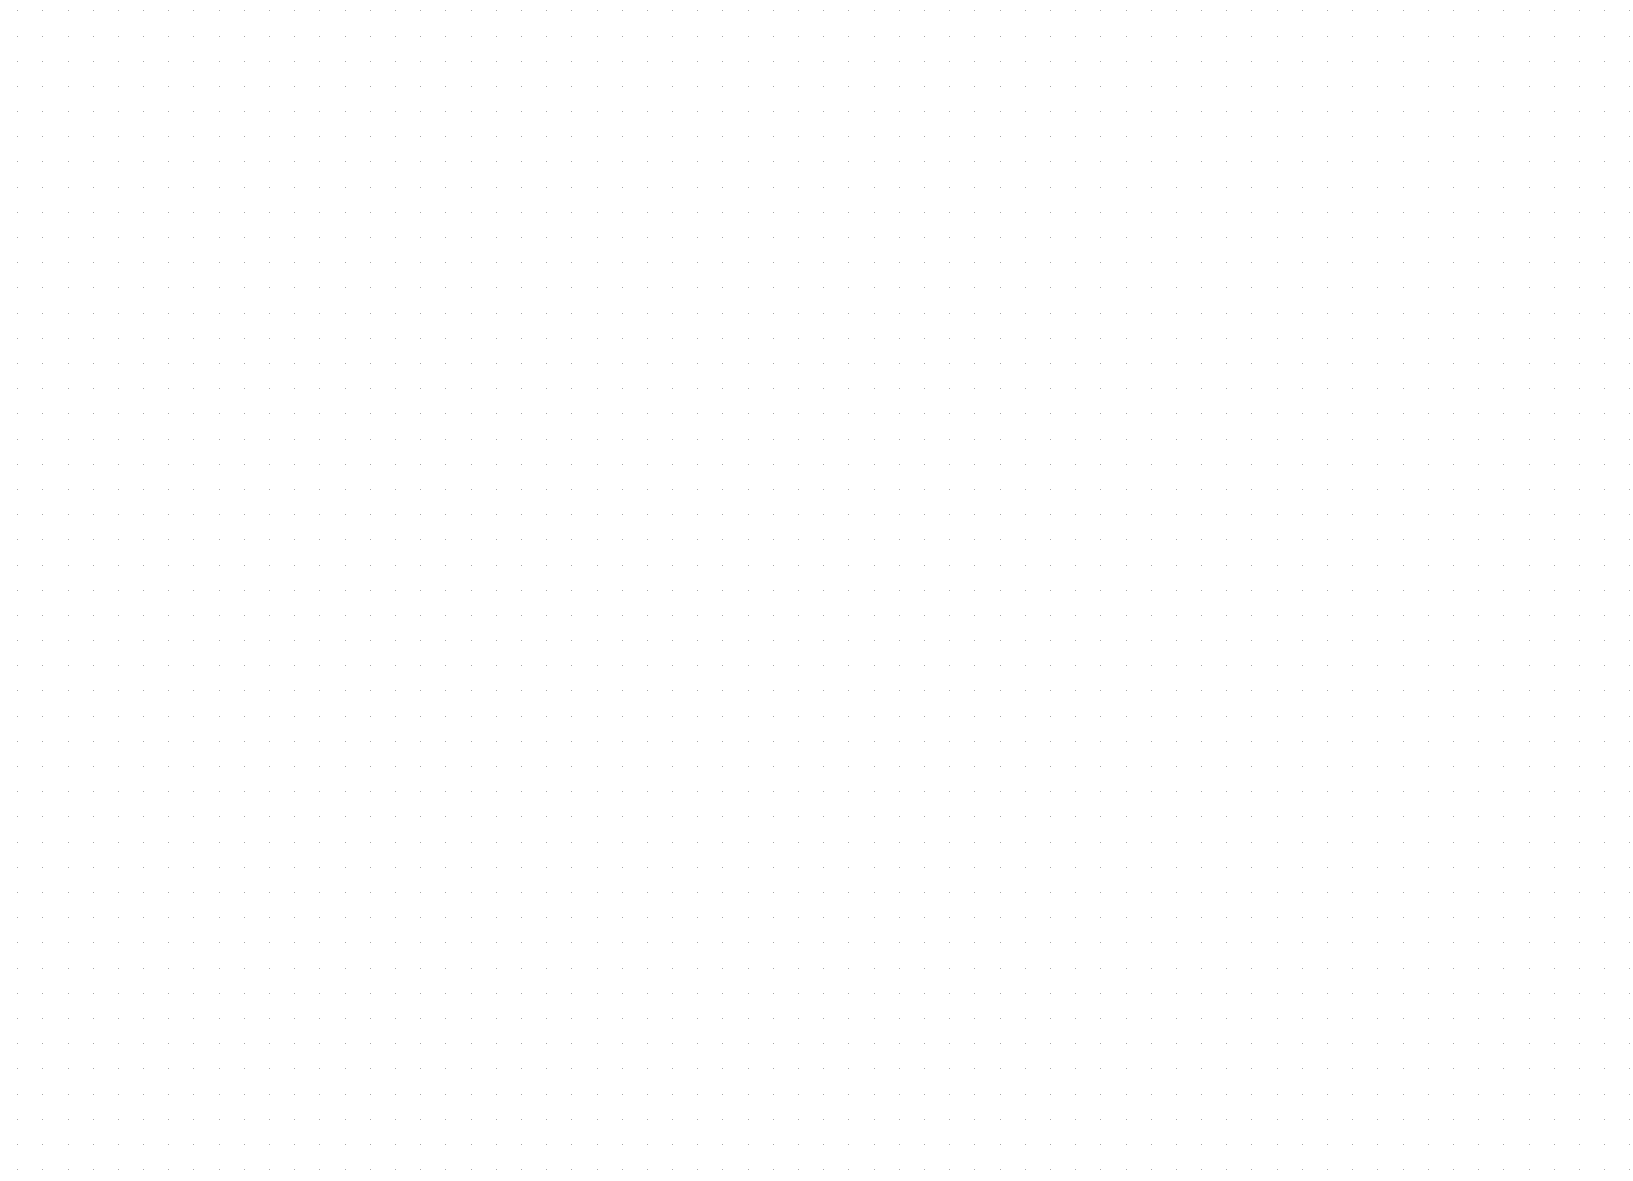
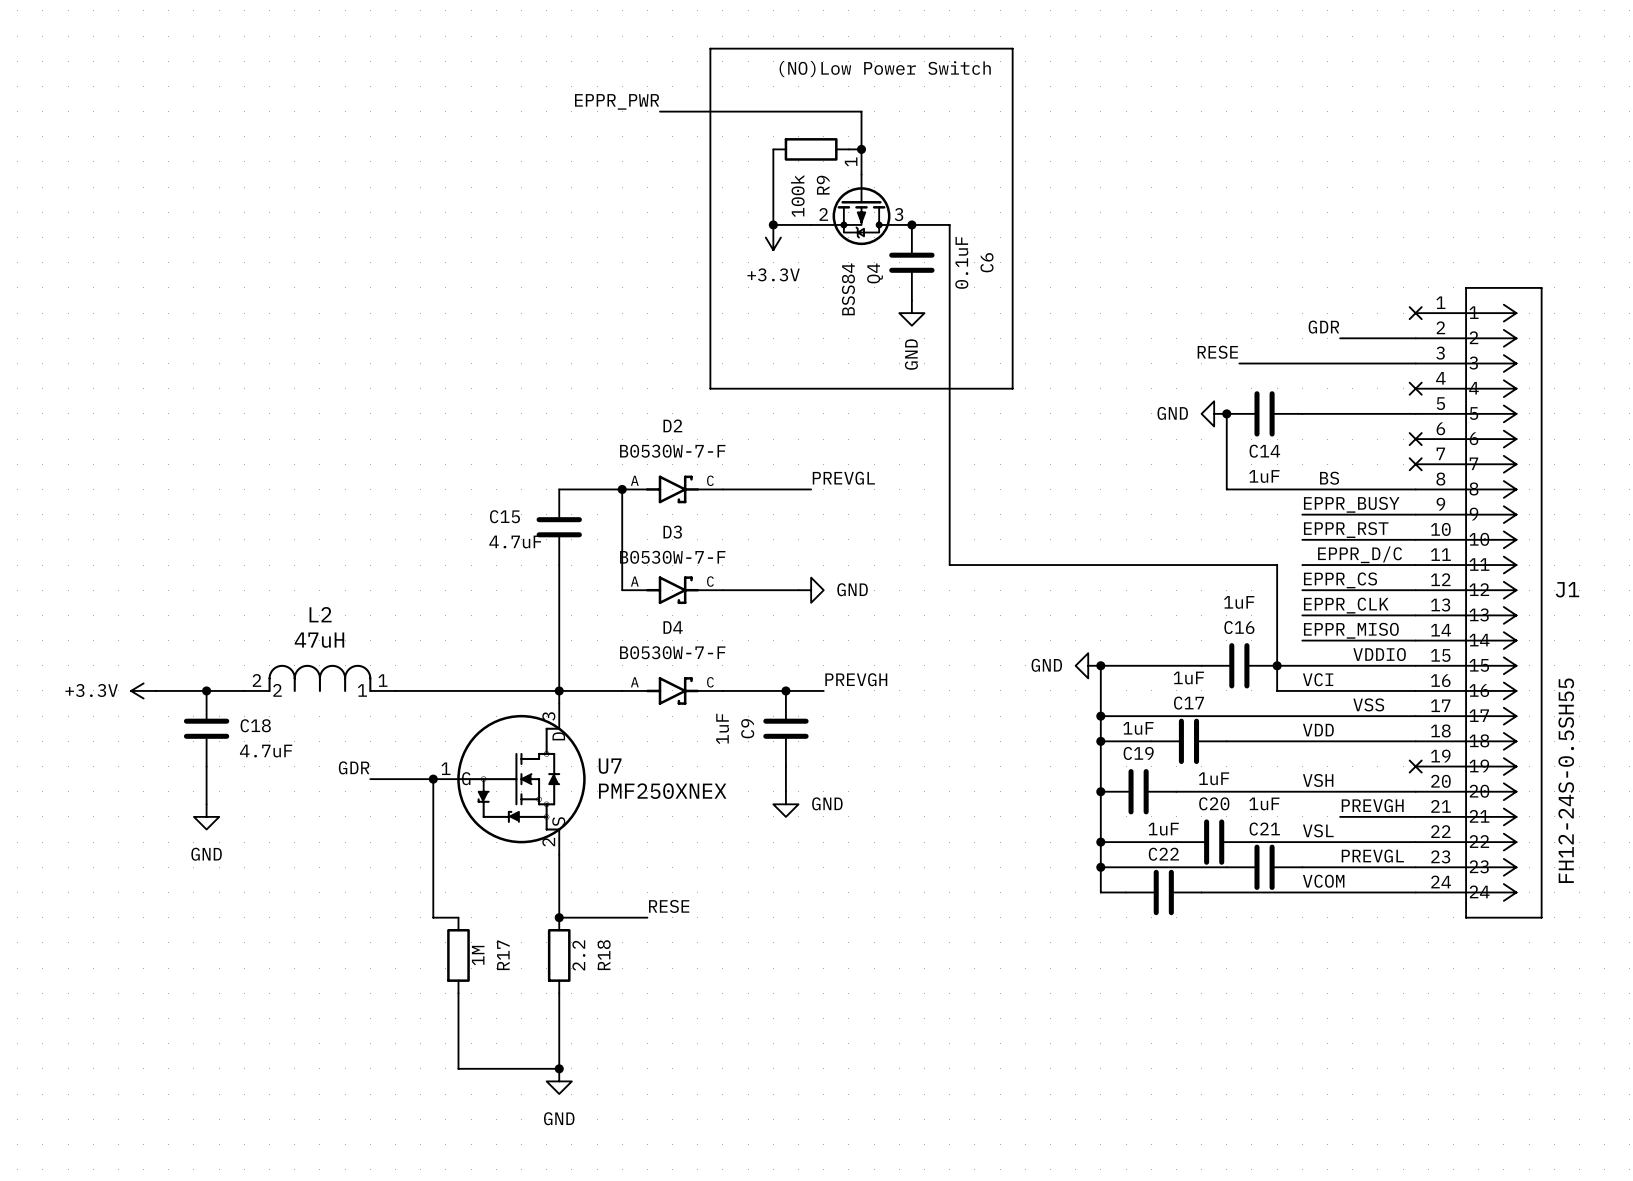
line: none -> (710, 48) (1012, 48) (1012, 388) (710, 388) (710, 48)
text: none -> (NO)Low Power Switch (885, 69)
label: none -> EPPR_PWR (617, 101)
wire: none -> (660, 111) (861, 111) (861, 149) (848, 149)
wire: none -> (773, 149) (773, 224) (811, 224)
R9: none -> 100k (811, 149)
junction: none -> (861, 149)
Q4: none -> BSS84 (861, 197)
junction: none -> (773, 224)
wire: none -> (911, 224) (949, 224) (949, 565) (1277, 565) (1277, 690) (1415, 690)
junction: none -> (911, 224)
power symbol: none -> +3.3V (773, 237)
C6: none -> 0.1uF (911, 262)
power symbol: none -> GND (911, 313)
no-connect mark: none -> (1415, 313)
label: none -> GDR (1323, 327)
wire: none -> (1340, 338) (1415, 338)
label: none -> RESE (1217, 352)
wire: none -> (1239, 363) (1415, 363)
no-connect mark: none -> (1415, 388)
power symbol: none -> GND (1214, 413)
wire: none -> (1226, 413) (1226, 489) (1415, 489)
junction: none -> (1226, 413)
C14: none -> 1uF (1264, 413)
wire: none -> (1302, 413) (1415, 413)
no-connect mark: none -> (1415, 439)
no-connect mark: none -> (1415, 464)
label: none -> PREVGL (843, 478)
label: none -> BS (1329, 478)
wire: none -> (559, 489) (622, 489) (622, 590)
junction: none -> (622, 489)
D2: none -> B0530W-7-F (672, 489)
wire: none -> (722, 489) (811, 489)
label: none -> EPPR_BUSY (1351, 504)
wire: none -> (1302, 514) (1415, 514)
C15: none -> 4.7uF (559, 527)
label: none -> EPPR_RST (1346, 530)
wire: none -> (1302, 539) (1415, 539)
label: none -> EPPR_D/C (1360, 554)
wire: none -> (559, 565) (559, 703)
wire: none -> (1302, 565) (1415, 565)
label: none -> EPPR_CS (1340, 580)
D3: none -> B0530W-7-F (672, 590)
wire: none -> (722, 590) (798, 590)
power symbol: none -> GND (811, 590)
wire: none -> (1302, 590) (1415, 590)
J1: none -> FH12-24S-0.5SH55 (1478, 602)
label: none -> EPPR_CLK (1346, 605)
wire: none -> (1302, 615) (1415, 615)
label: none -> EPPR_MISO (1351, 630)
wire: none -> (1302, 640) (1415, 640)
label: none -> VDDIO (1379, 654)
power symbol: none -> GND (1088, 665)
junction: none -> (1100, 665)
wire: none -> (1201, 665) (1100, 665) (1100, 892) (1126, 892)
C16: none -> 1uF (1239, 665)
wire: none -> (1277, 665) (1415, 665)
junction: none -> (1277, 665)
L2: none -> 47uH (319, 678)
label: none -> PREVGH (856, 679)
label: none -> VCI (1318, 679)
power symbol: none -> +3.3V (143, 690)
wire: none -> (156, 690) (244, 690)
junction: none -> (206, 690)
wire: none -> (395, 690) (622, 690)
junction: none -> (559, 690)
D4: none -> B0530W-7-F (672, 690)
wire: none -> (722, 690) (823, 690)
junction: none -> (785, 690)
label: none -> VSS (1368, 704)
wire: none -> (1100, 716) (1415, 716)
junction: none -> (1100, 716)
C18: none -> 4.7uF (206, 728)
C9: none -> 1uF (785, 728)
label: none -> VDD (1318, 730)
wire: none -> (1100, 741) (1151, 741)
junction: none -> (1100, 741)
C17: none -> 1uF (1188, 741)
wire: none -> (1226, 741) (1415, 741)
wire: none -> (206, 766) (206, 804)
wire: none -> (785, 766) (785, 791)
no-connect mark: none -> (1415, 766)
label: none -> GDR (354, 767)
wire: none -> (370, 779) (433, 779) (433, 917) (458, 917)
junction: none -> (433, 779)
U7: none -> PMF250XNEX (509, 779)
label: none -> VSH (1318, 780)
junction: none -> (1100, 791)
C19: none -> 1uF (1138, 791)
wire: none -> (1176, 791) (1415, 791)
power symbol: none -> GND (785, 804)
label: none -> PREVGH (1372, 805)
power symbol: none -> GND (206, 816)
wire: none -> (1340, 816) (1415, 816)
label: none -> VSL (1318, 830)
wire: none -> (1100, 842) (1176, 842)
junction: none -> (1100, 842)
C20: none -> 1uF (1214, 842)
wire: none -> (1251, 842) (1415, 842)
wire: none -> (559, 854) (559, 917) (647, 917)
label: none -> PREVGL (1372, 856)
wire: none -> (1100, 867) (1226, 867)
junction: none -> (1100, 867)
C21: none -> 1uF (1264, 867)
wire: none -> (1302, 867) (1415, 867)
label: none -> VCOM (1323, 881)
C22: none -> 1uF (1163, 892)
wire: none -> (1201, 892) (1415, 892)
label: none -> RESE (669, 906)
junction: none -> (559, 917)
R17: none -> 1M (458, 955)
R18: none -> 2.2 (559, 955)
wire: none -> (458, 993) (458, 1068) (559, 1068) (559, 993)
junction: none -> (559, 1068)
power symbol: none -> GND (559, 1081)

